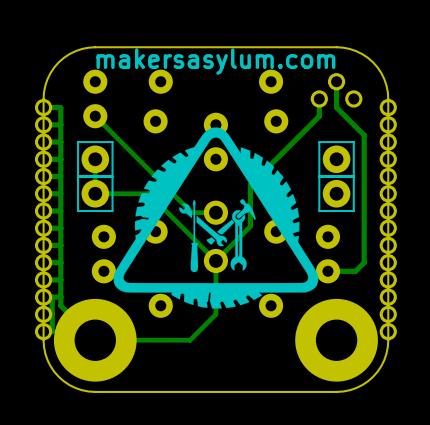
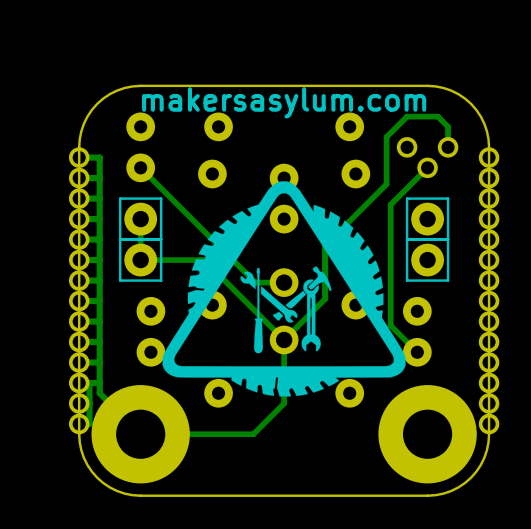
track: (336, 81) (336, 107) (364, 135) (364, 262) (355, 271) (327, 271) -> (427, 167) (390, 204) (390, 325) (417, 352)
part rotation: 0° (336, 90) -> 180° (427, 157)
track: (319, 98) (319, 116) (250, 185) -> (448, 147) (448, 126) (437, 116) (407, 116) (386, 137) (386, 184) (325, 245) (325, 249)

